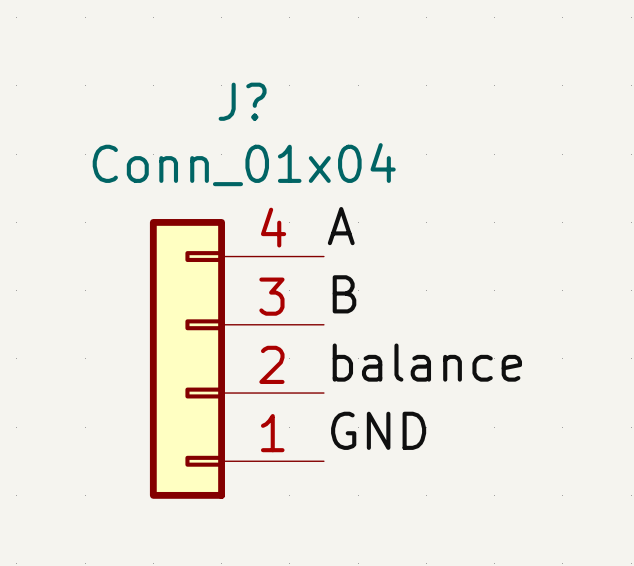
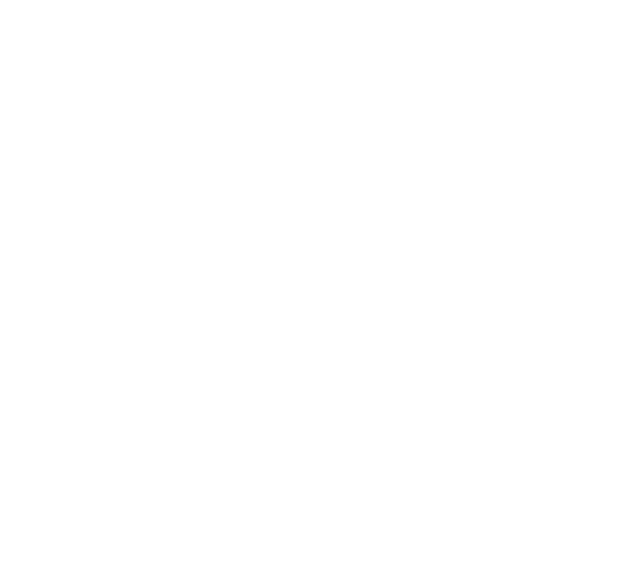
label: A (341, 226) -> none
label: B (344, 294) -> none
J?: Conn_01x04 (236, 358) -> none
label: balance (427, 362) -> none
label: GND (378, 430) -> none

